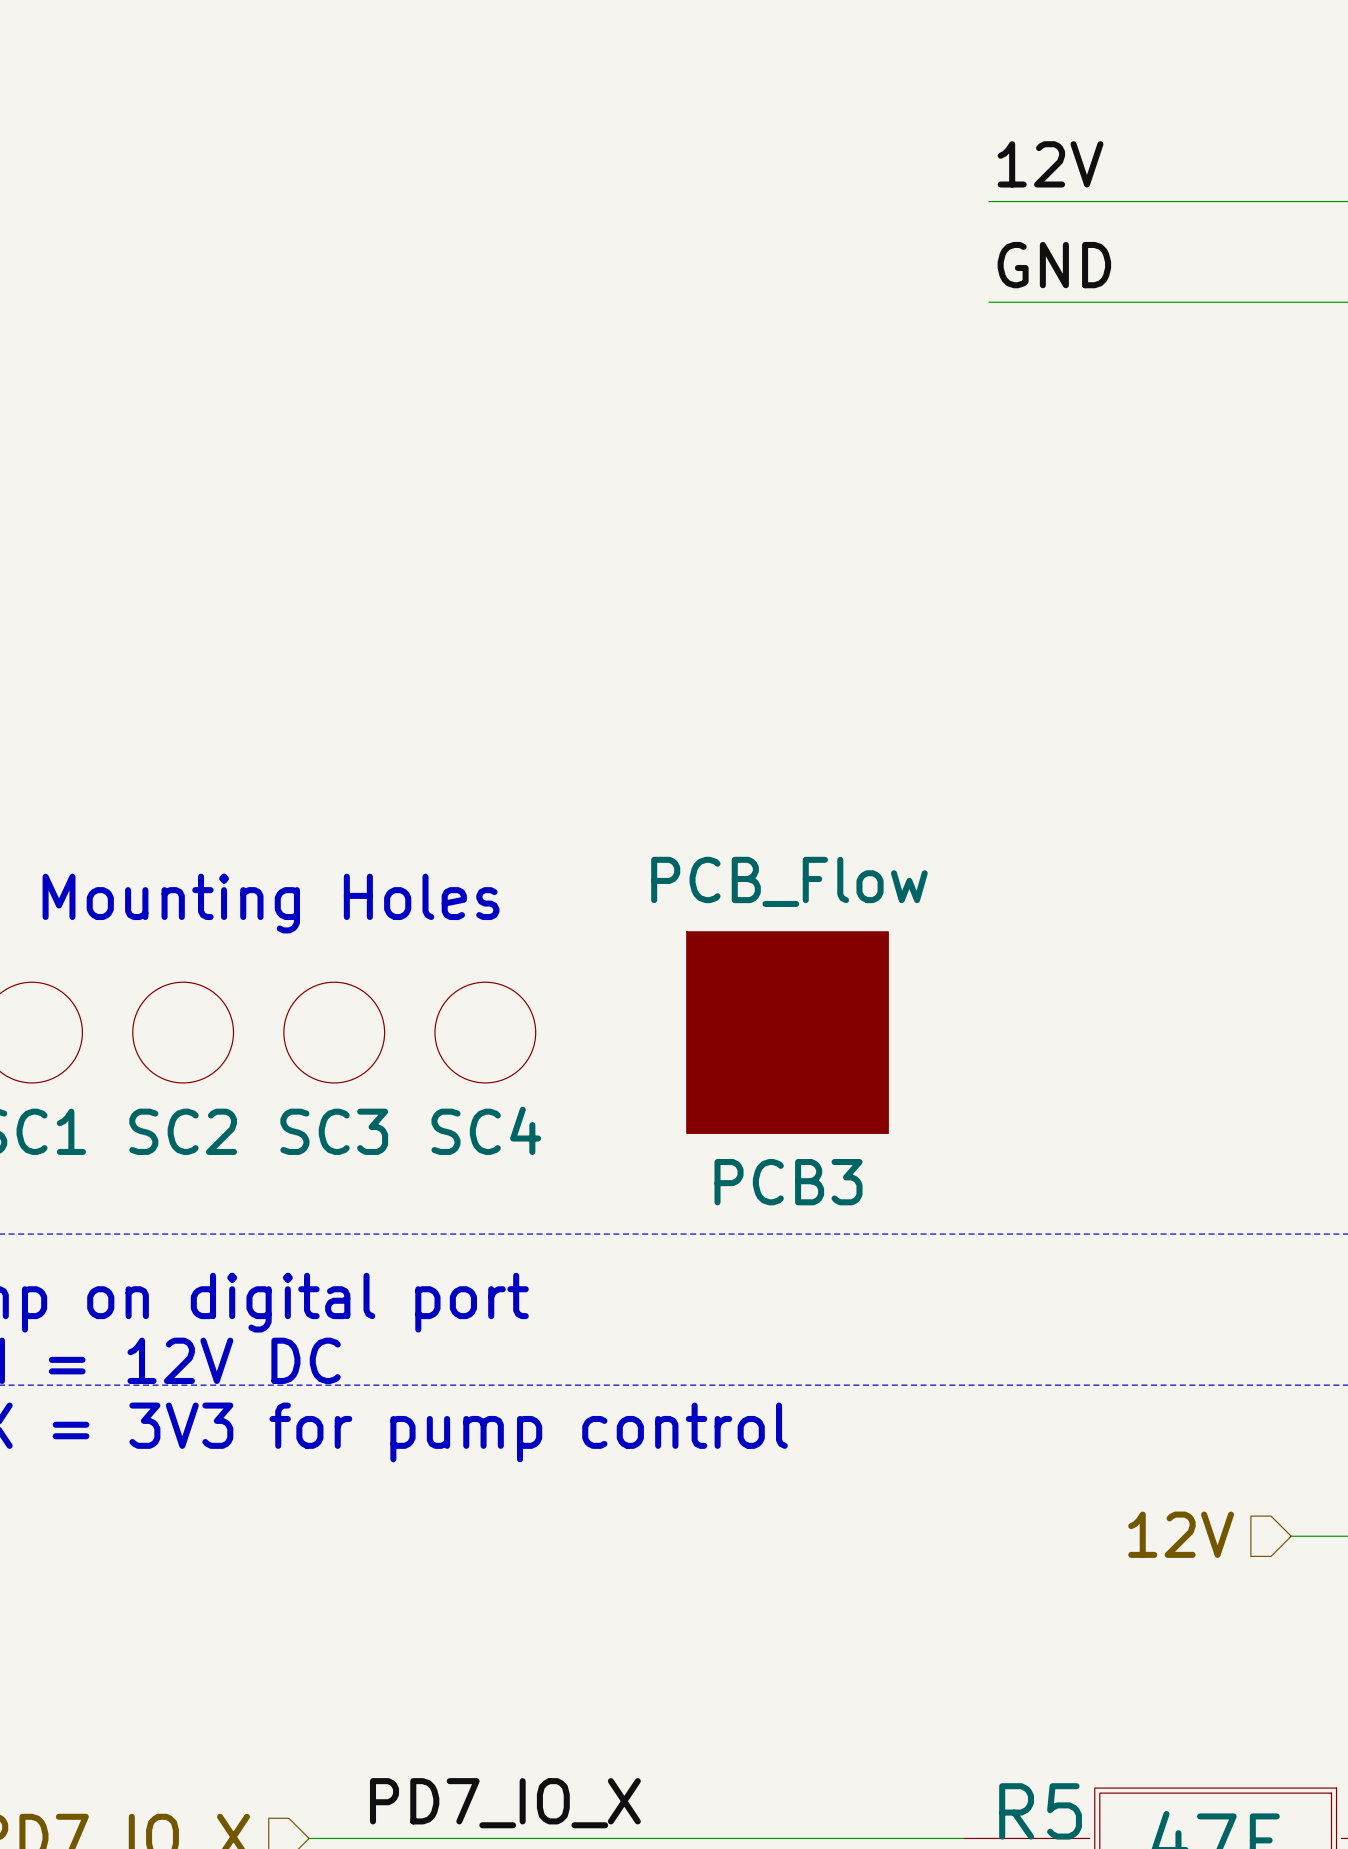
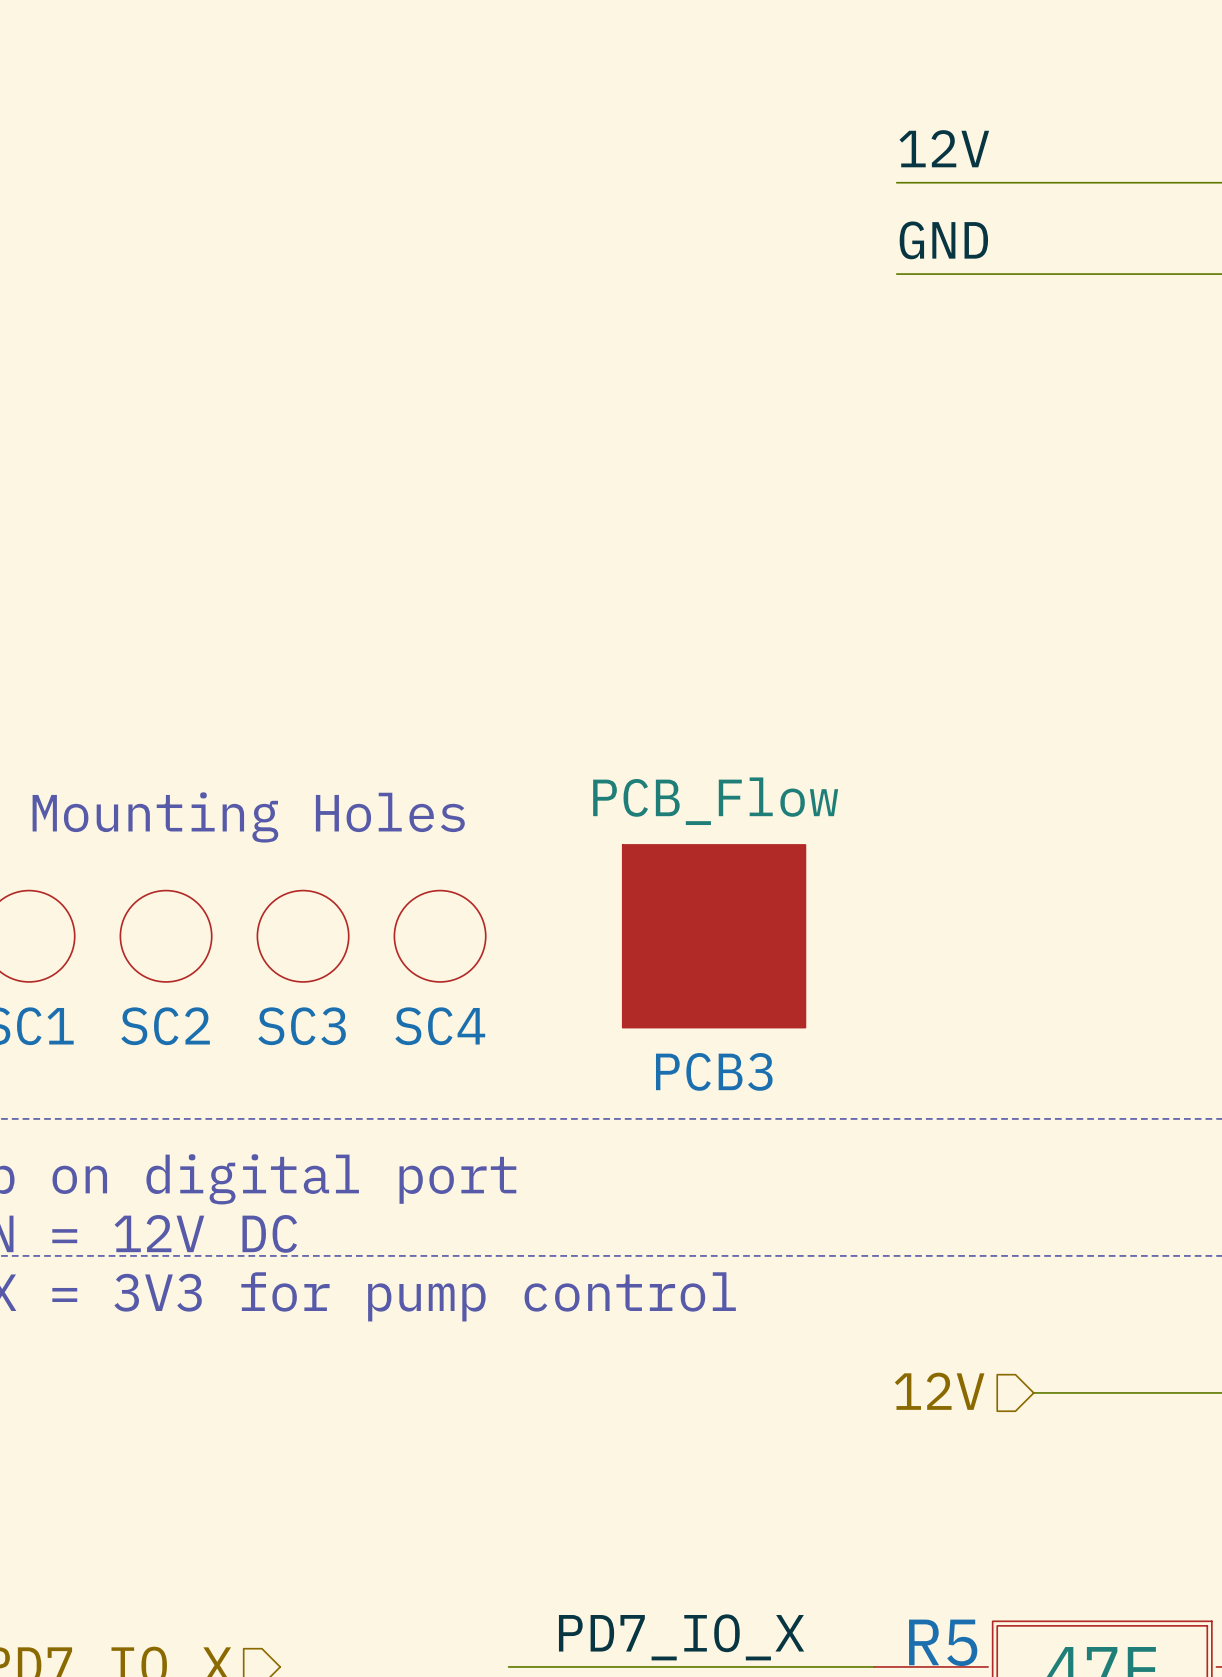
hierarchical label position: 12V (1181, 1534) -> 12V (939, 1391)
wire: none -> (1033, 1392) (1170, 1392)
label position: PD7_IO_X (505, 1803) -> PD7_IO_X (681, 1637)
wire: (309, 1838) (560, 1838) -> none

